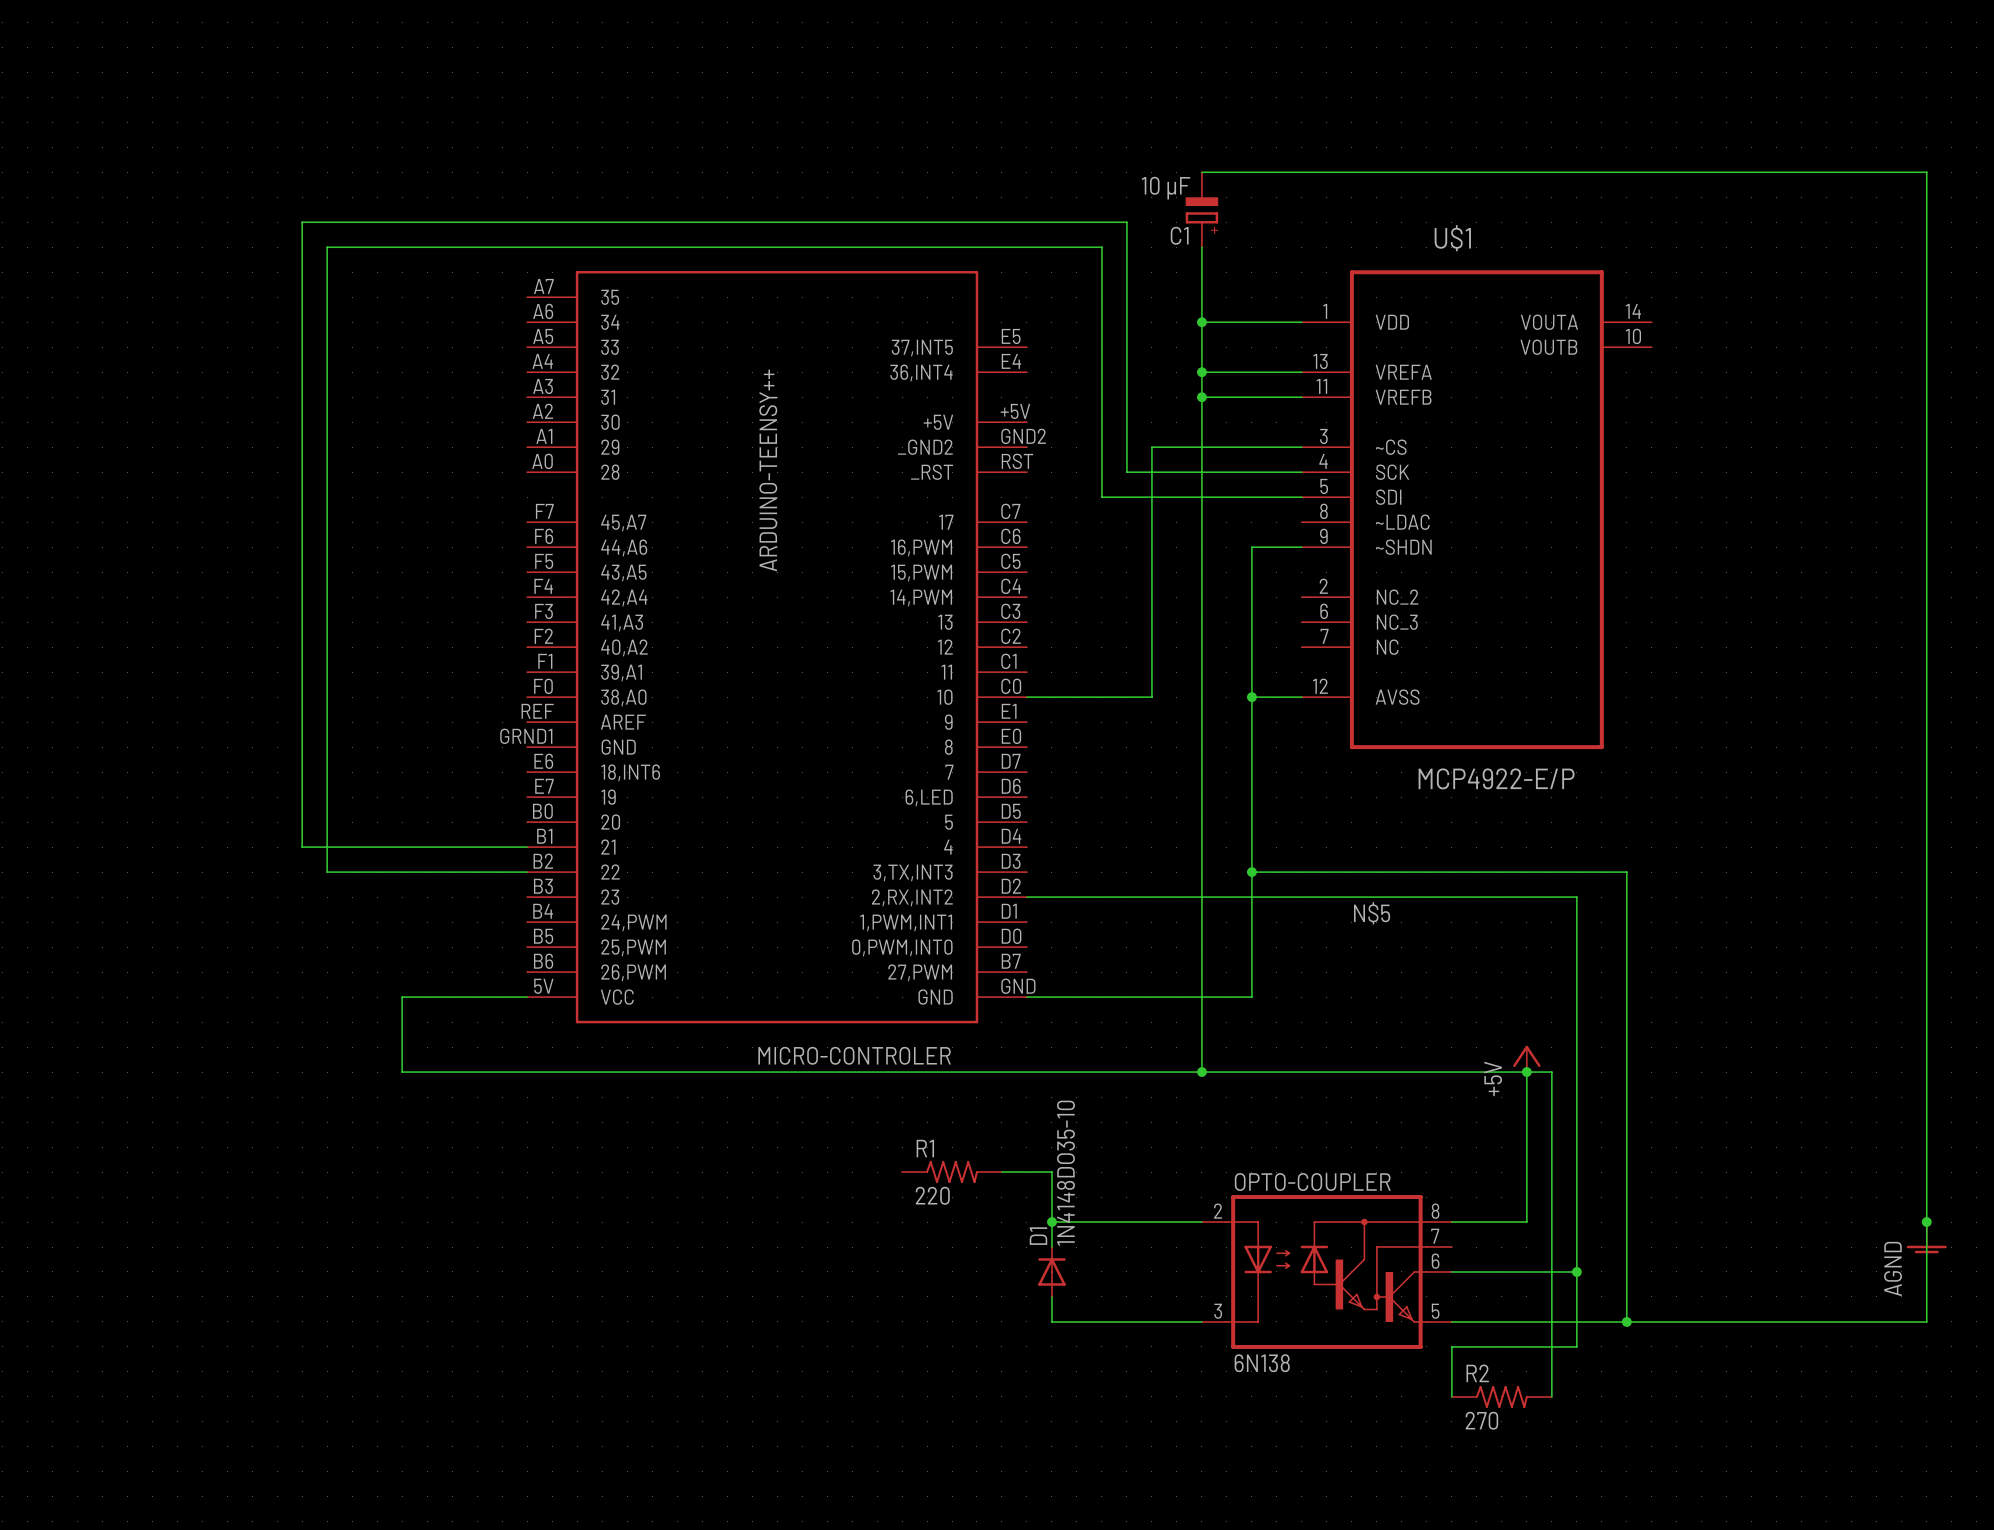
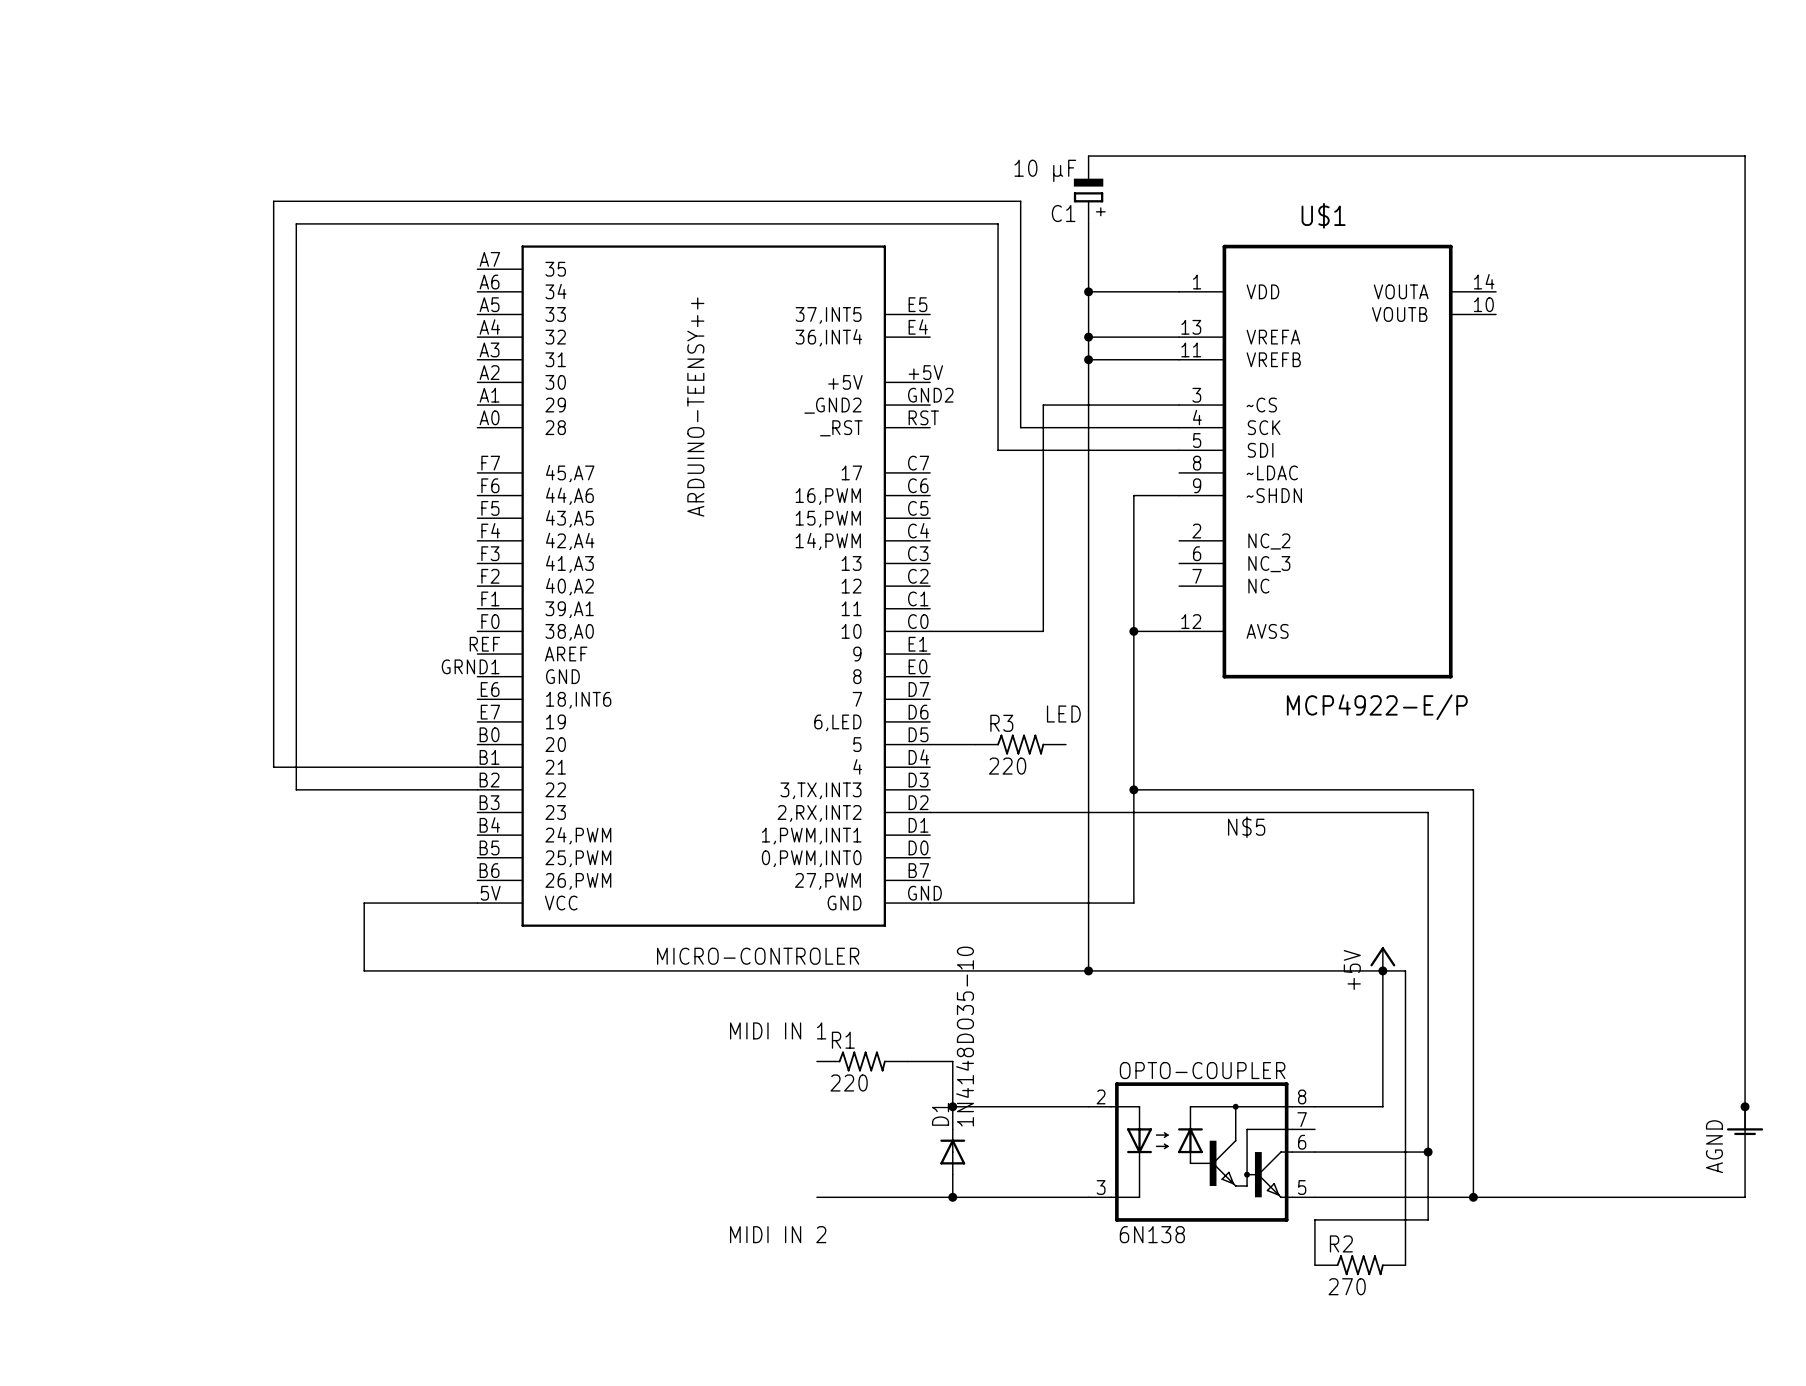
text: none -> LED (1063, 714)
wire: none -> (930, 744) (975, 744)
R3: none -> 220 (1020, 744)
text: none -> MIDI IN 1 (778, 1030)
wire: none -> (816, 1197) (952, 1197)
junction: none -> (952, 1197)
text: none -> MIDI IN 2 (778, 1234)

